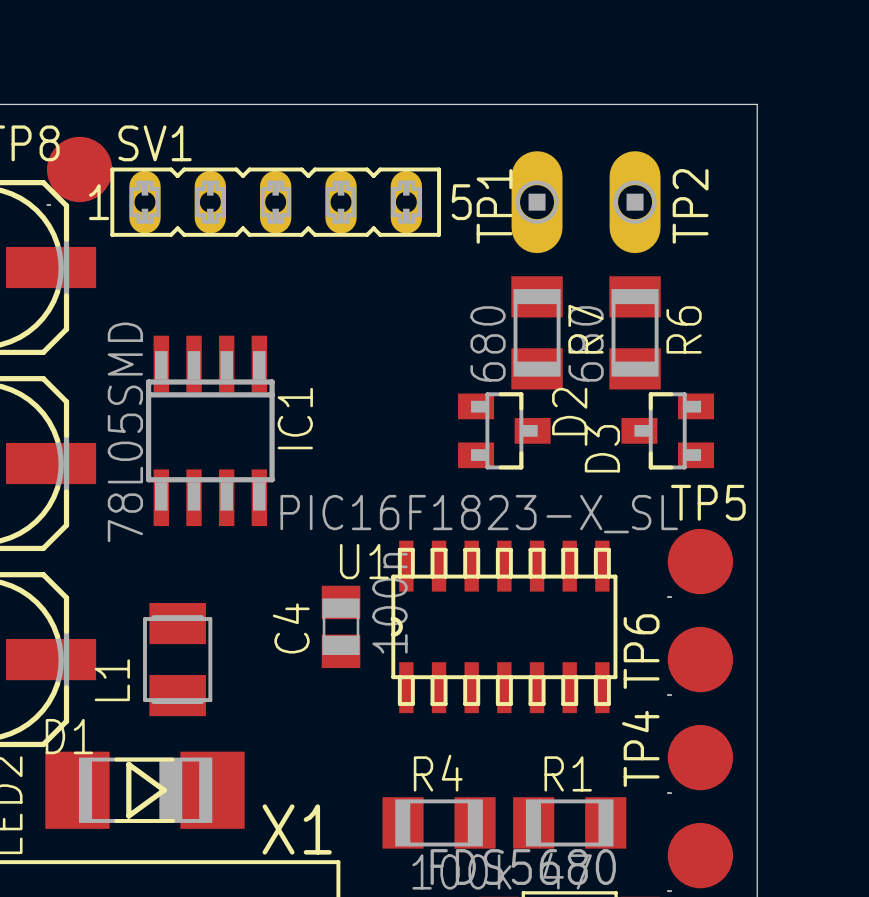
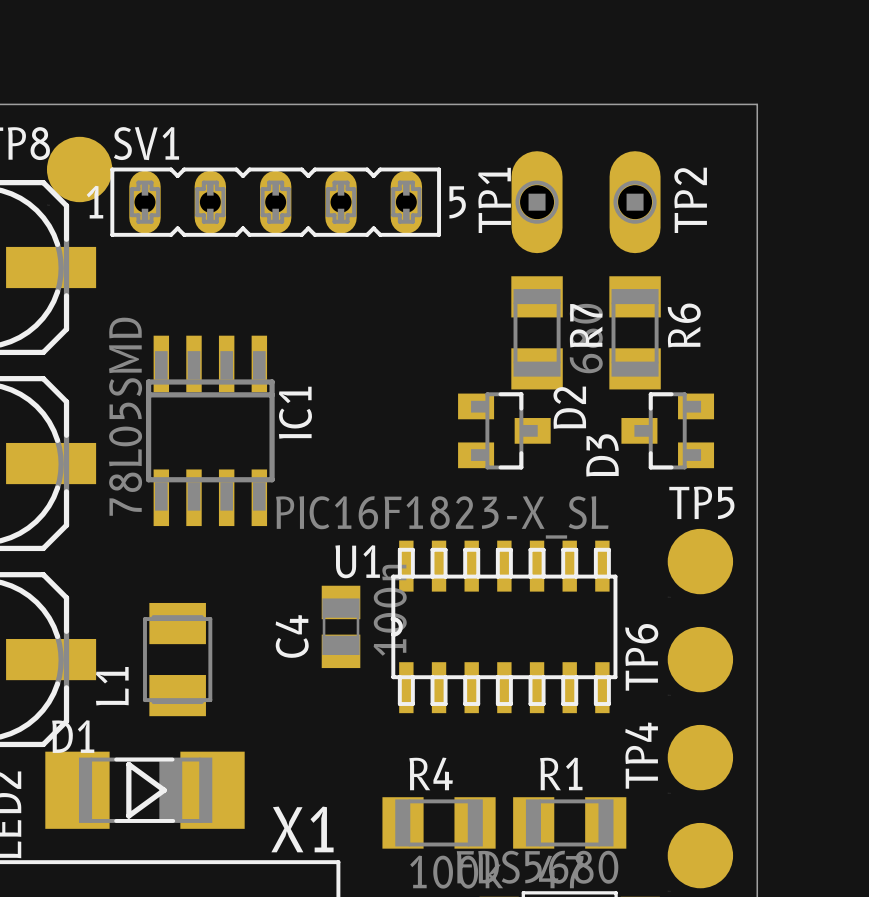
R7 value: 680 (488, 343) -> none

